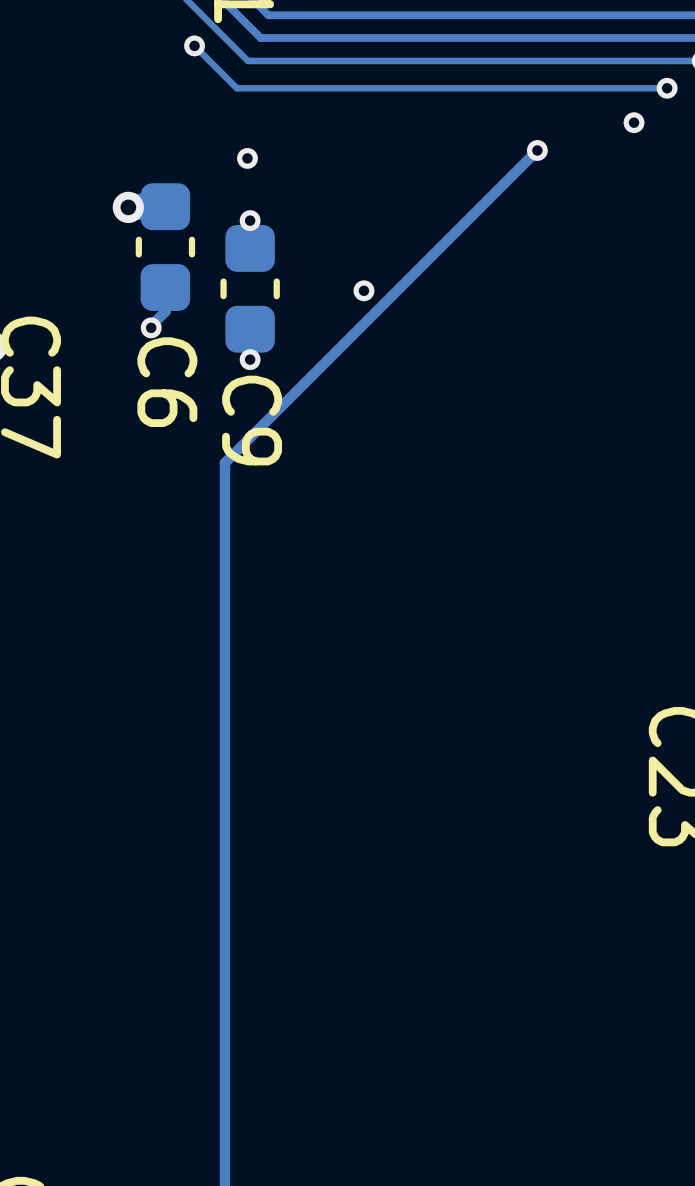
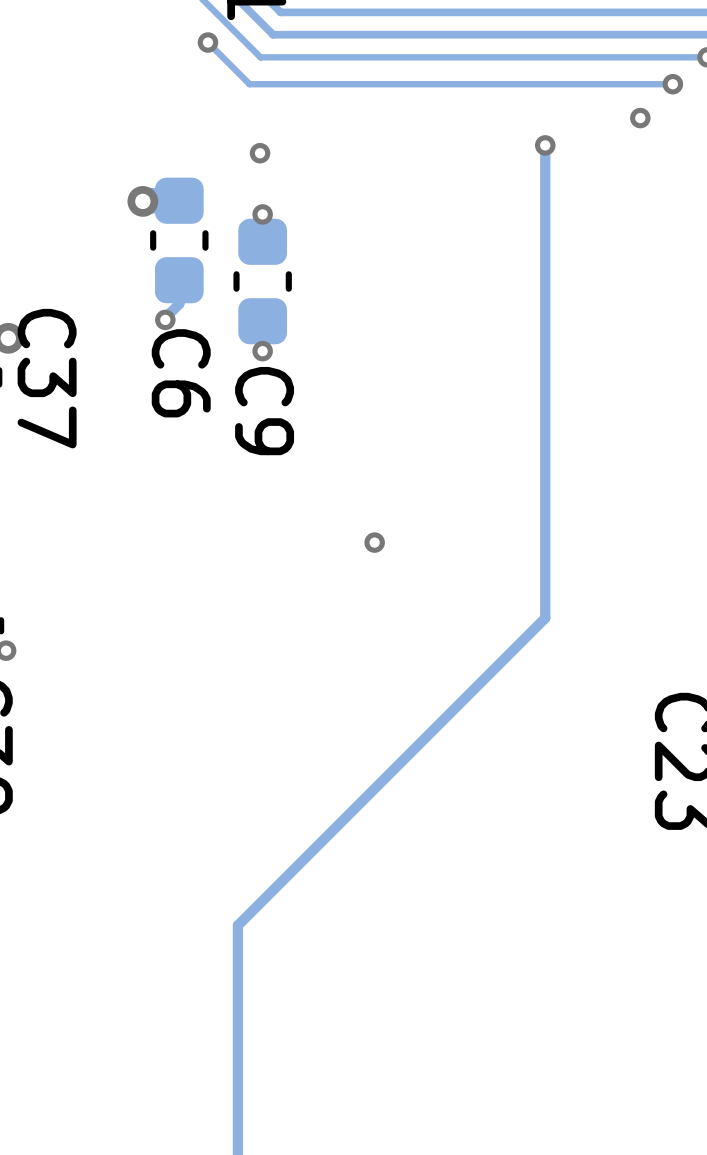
track: (537, 150) (224, 462) (224, 943) -> (545, 145) (545, 618) (237, 925)
via position: (363, 290) -> (374, 542)

